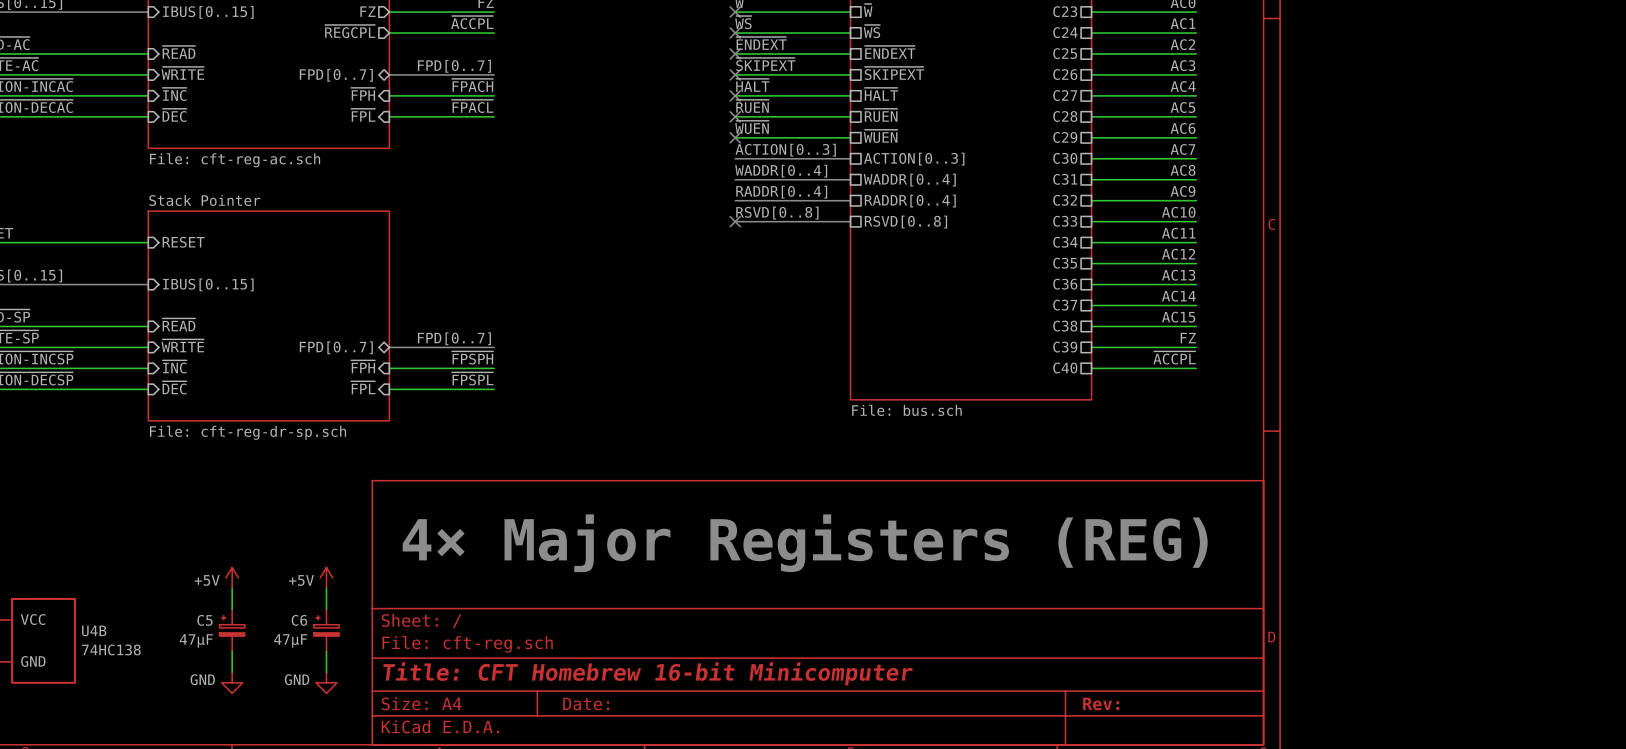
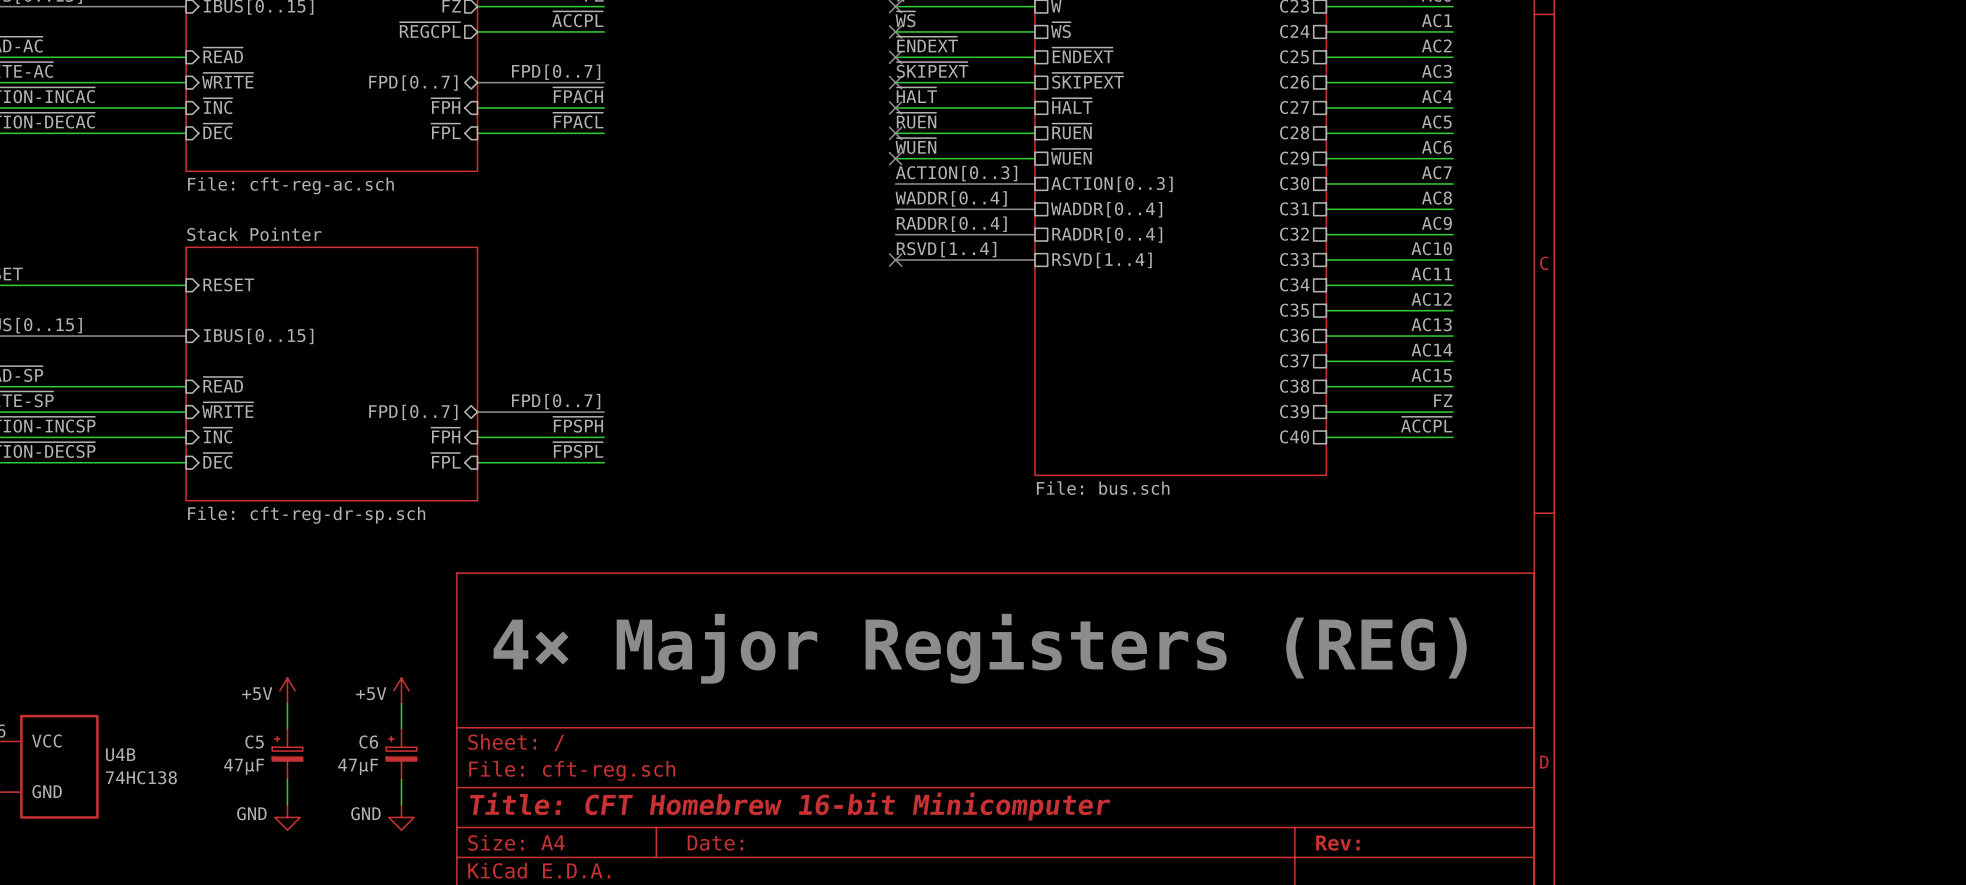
label: RSVD[0..8] (777, 213) -> RSVD[1..4] (946, 249)
sheet pin: RSVD[0..8] (905, 222) -> RSVD[1..4] (1102, 260)

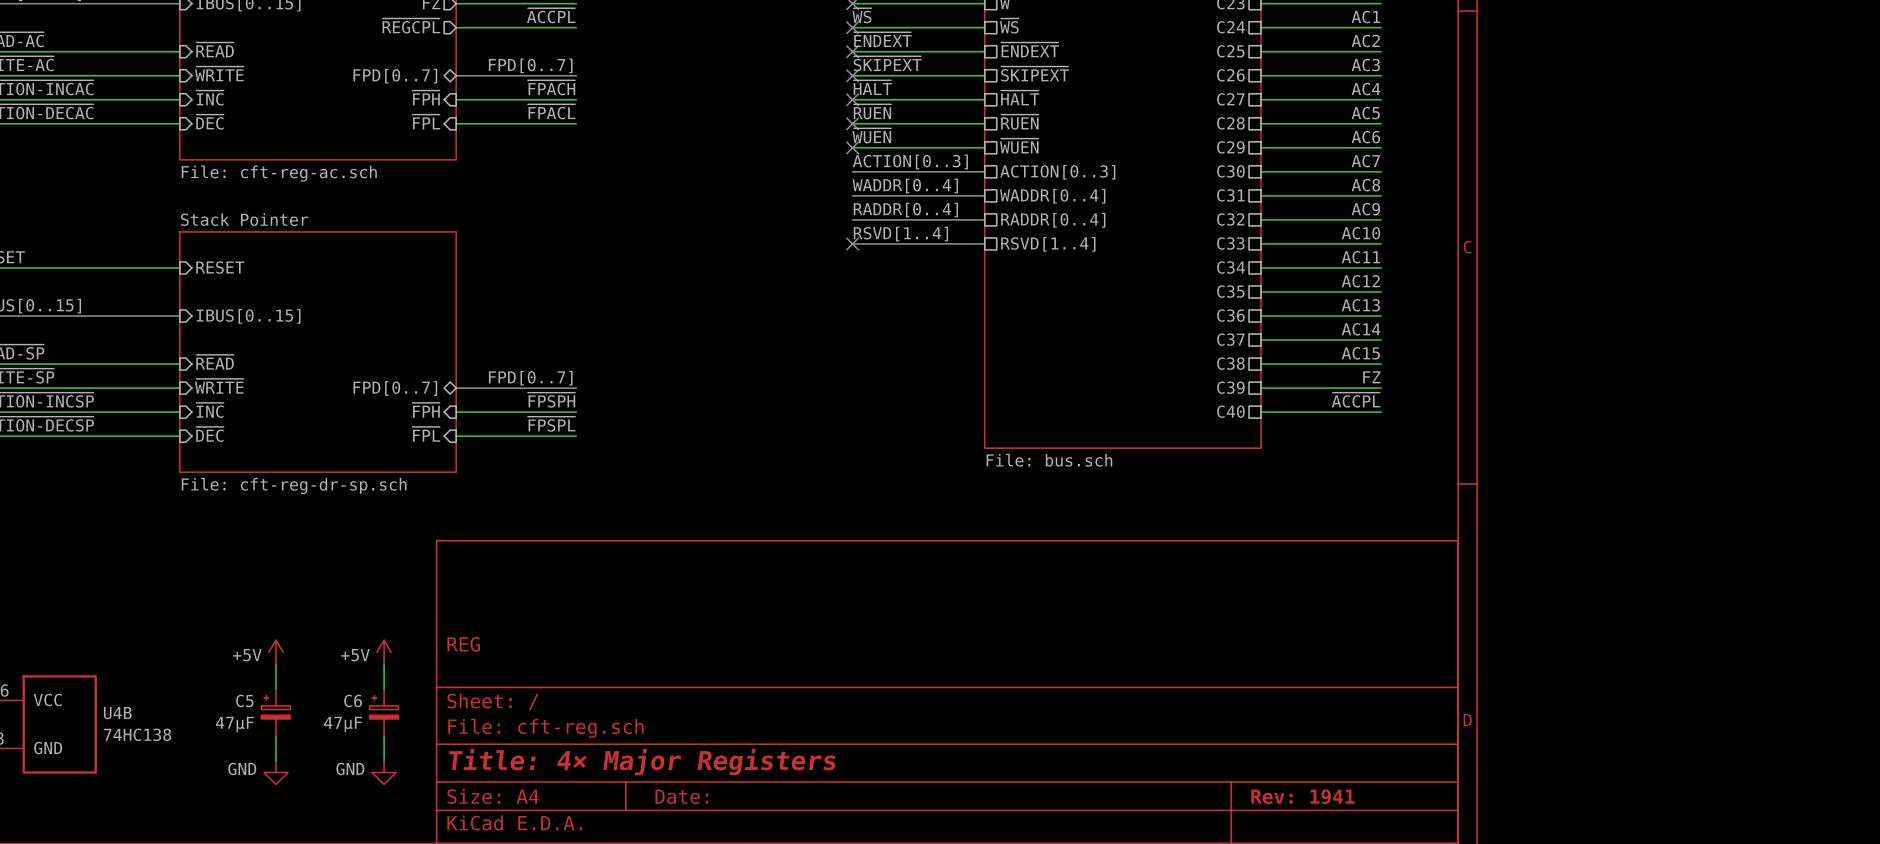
text: 4× Major Registers (REG) (980, 648) -> none
title block: none -> REG (463, 644)
title block: Title: CFT Homebrew 16-bit Minicomputer (790, 806) -> Title: 4× Major Registers (642, 762)
title block: Rev: (1337, 843) -> Rev: 1941 (1302, 796)

